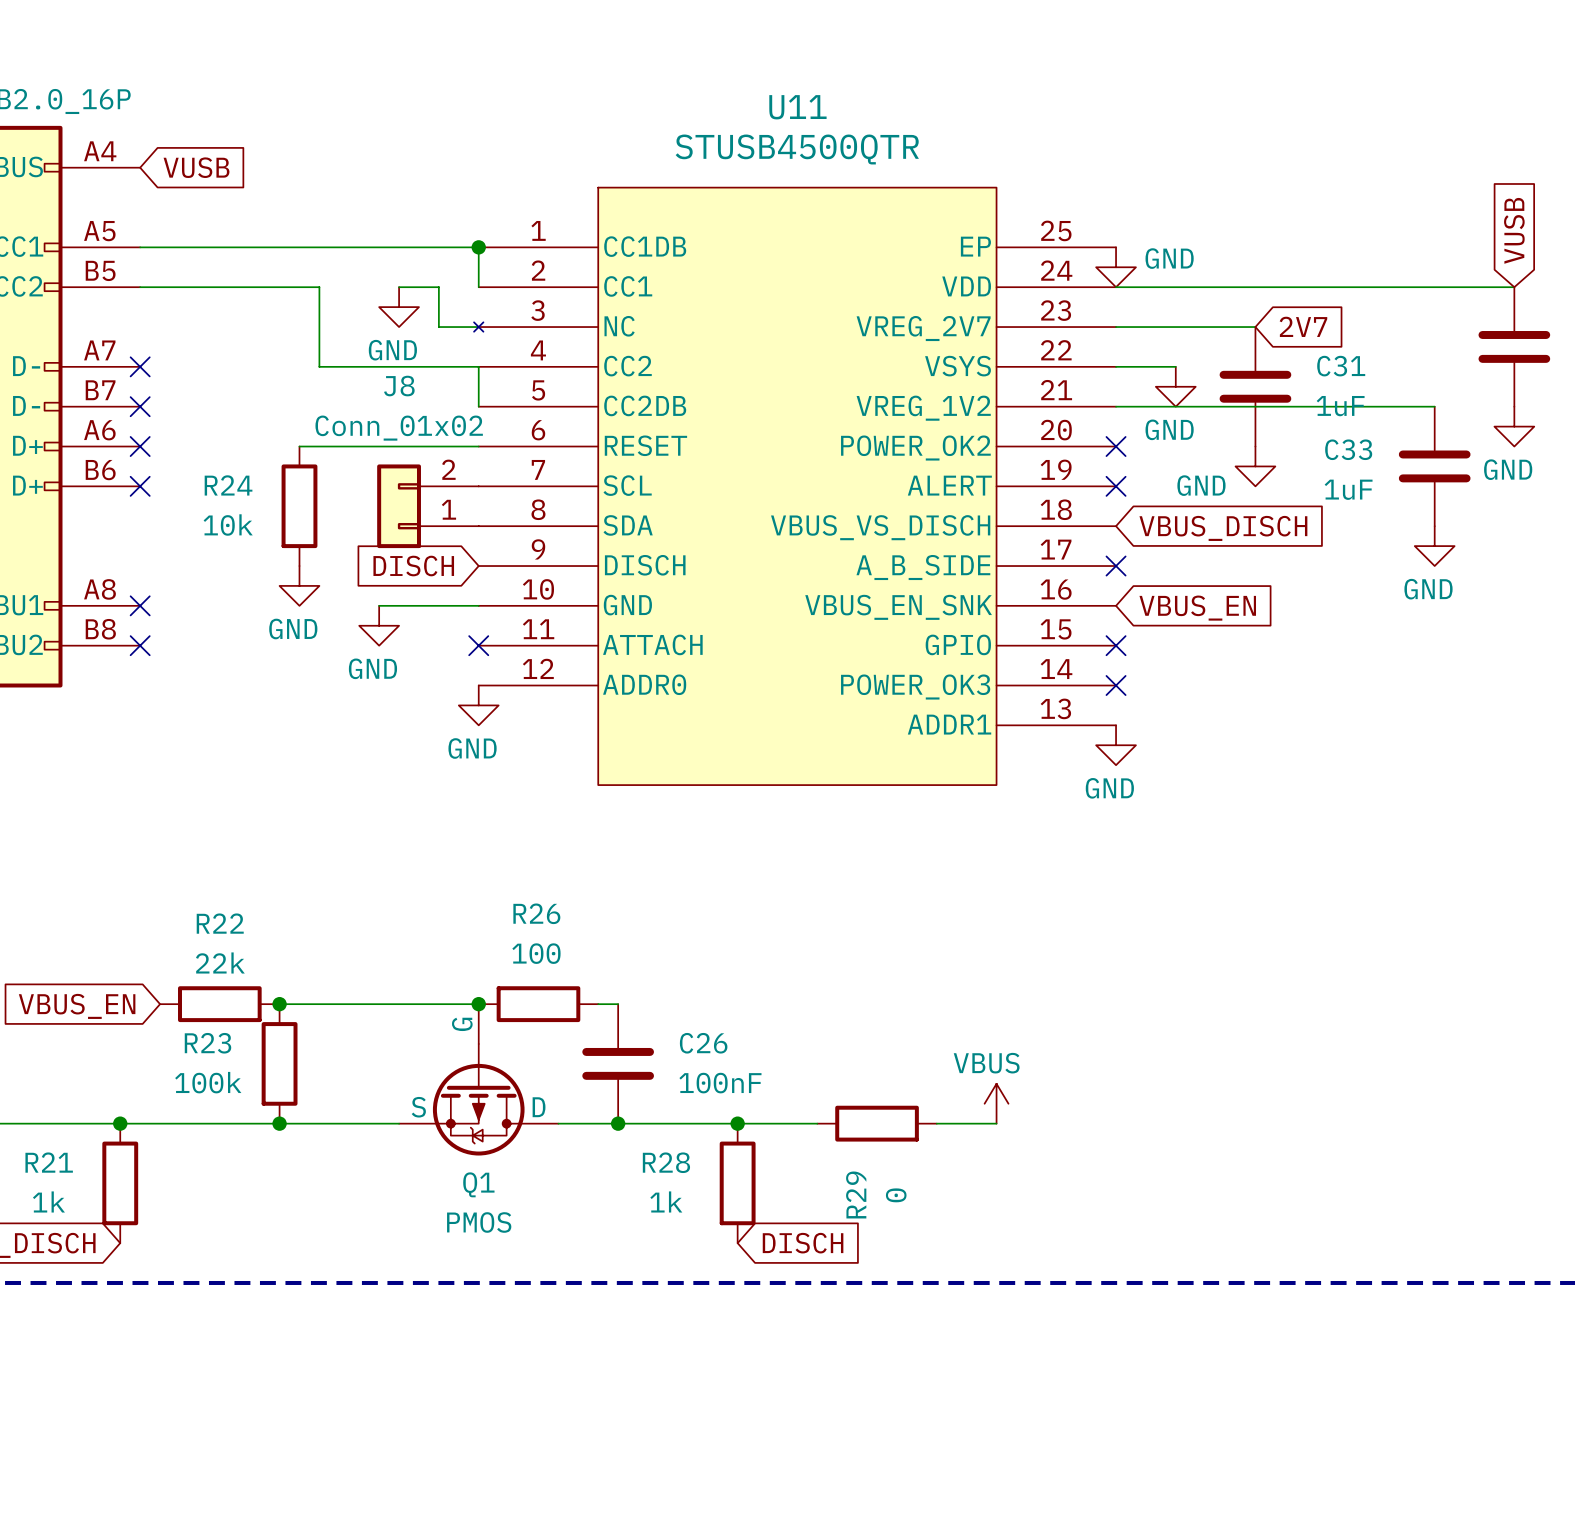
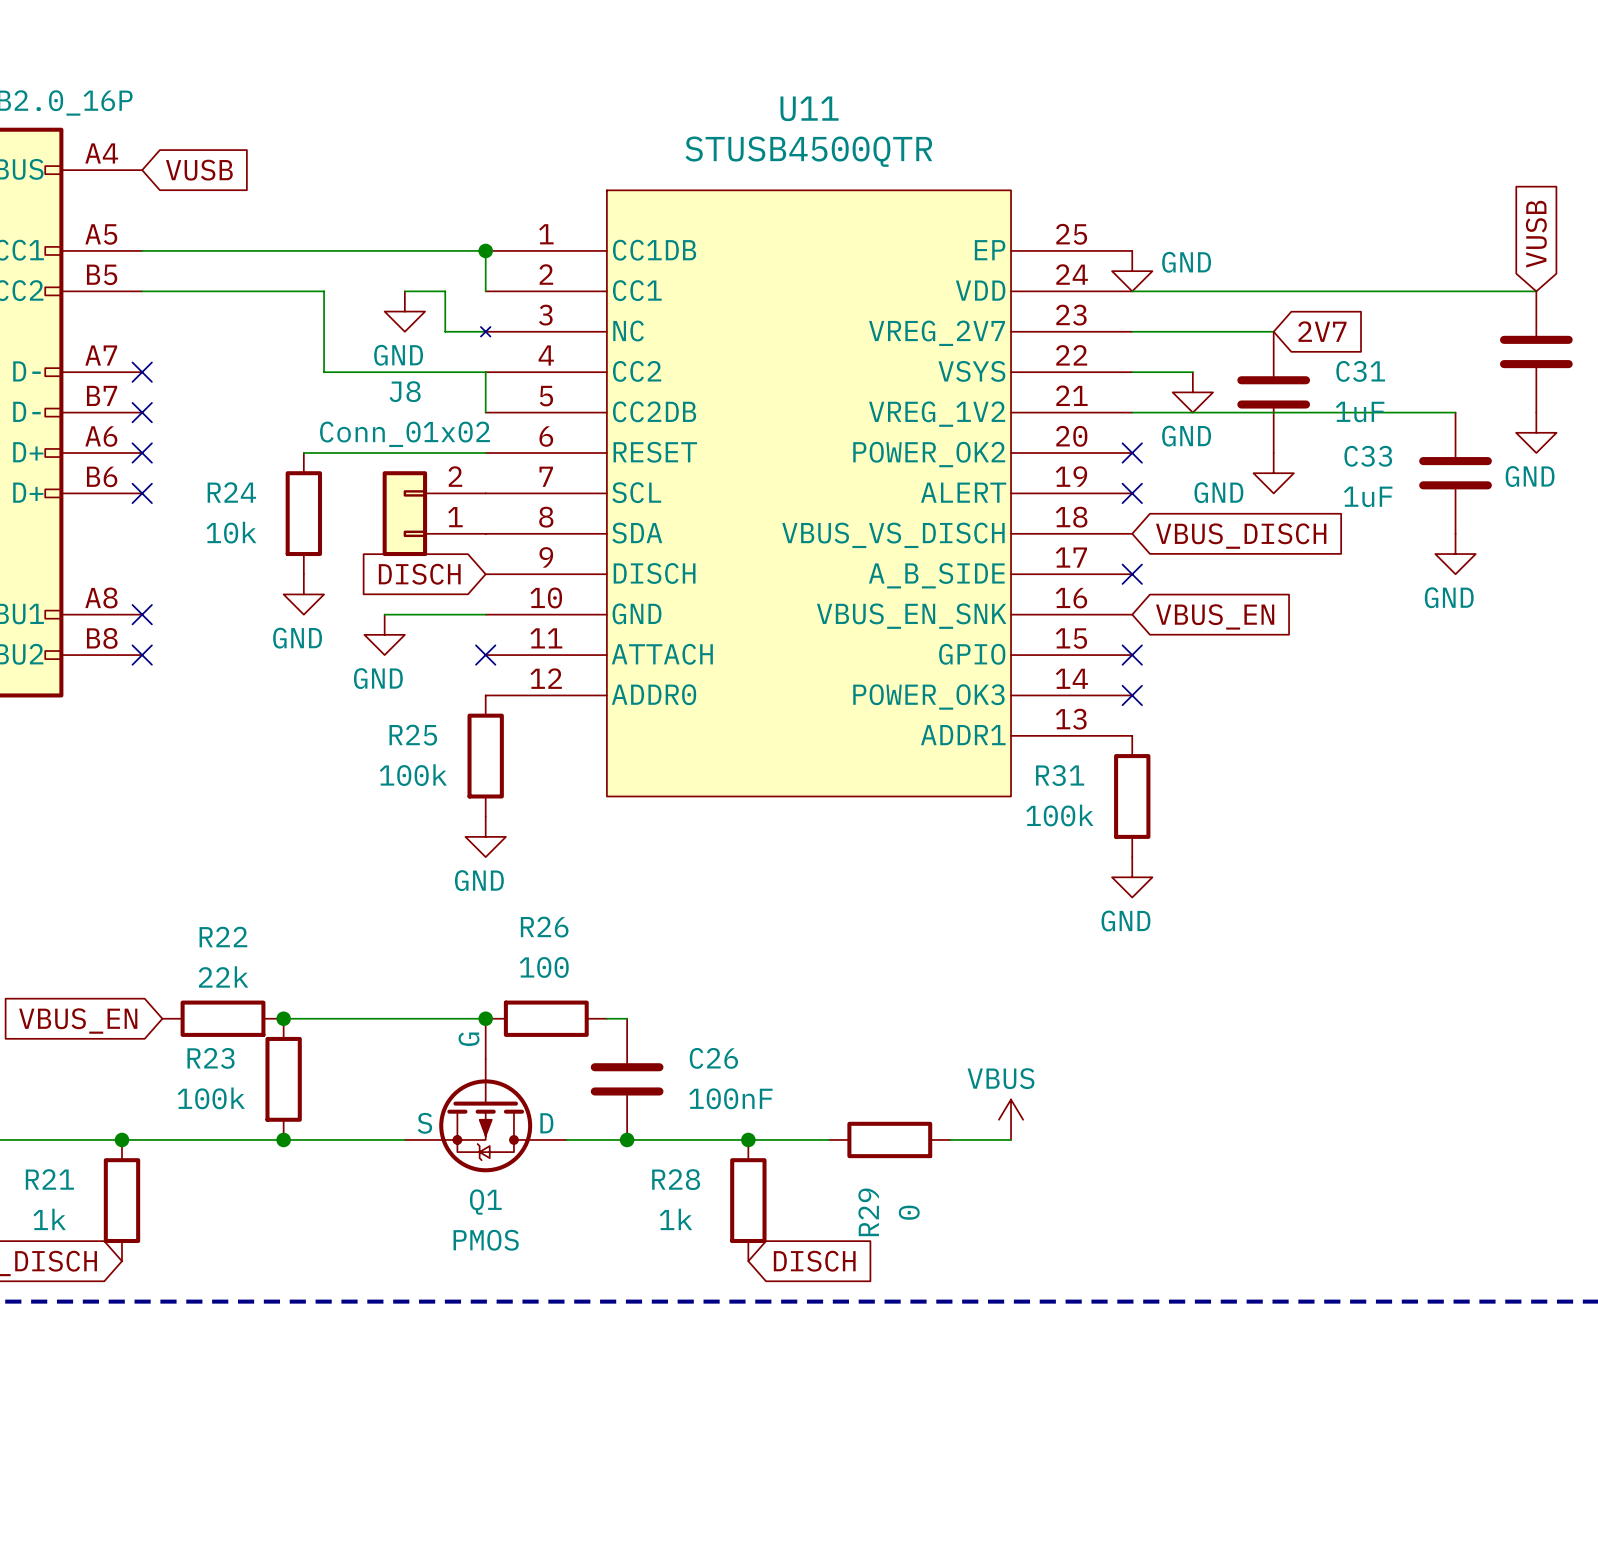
power symbol position: GND (478, 705) -> GND (485, 836)
R25: none -> 100k (485, 756)
power symbol position: GND (1116, 745) -> GND (1132, 877)
R31: none -> 100k (1132, 796)

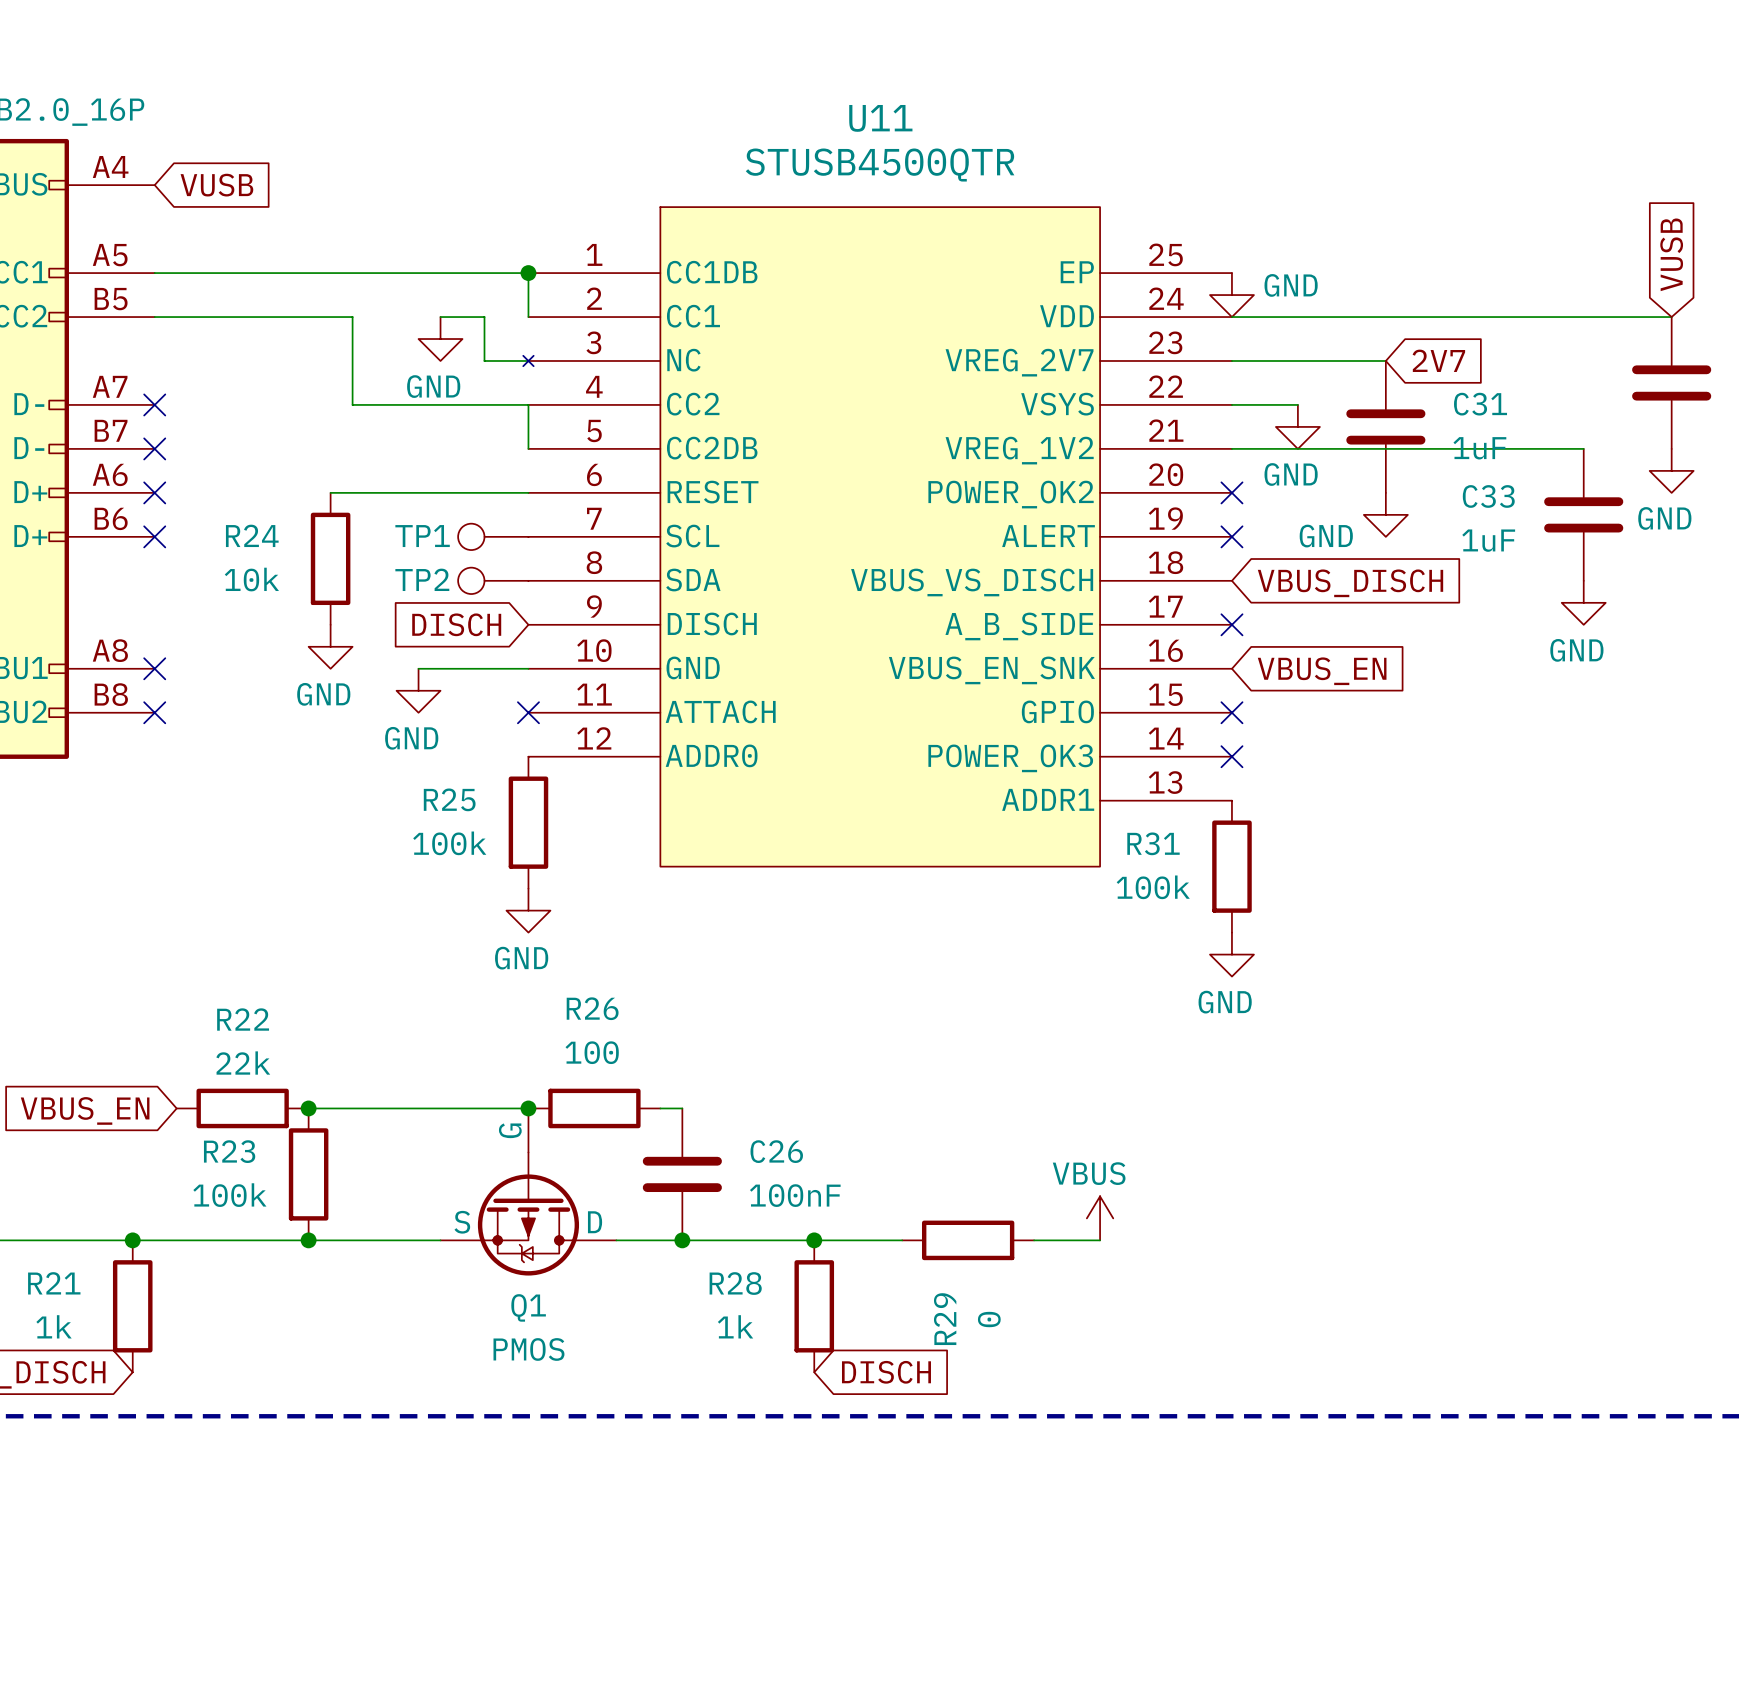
TP1: none -> (493, 536)
J8: Conn_01x02 (434, 513) -> none
TP2: none -> (493, 580)

